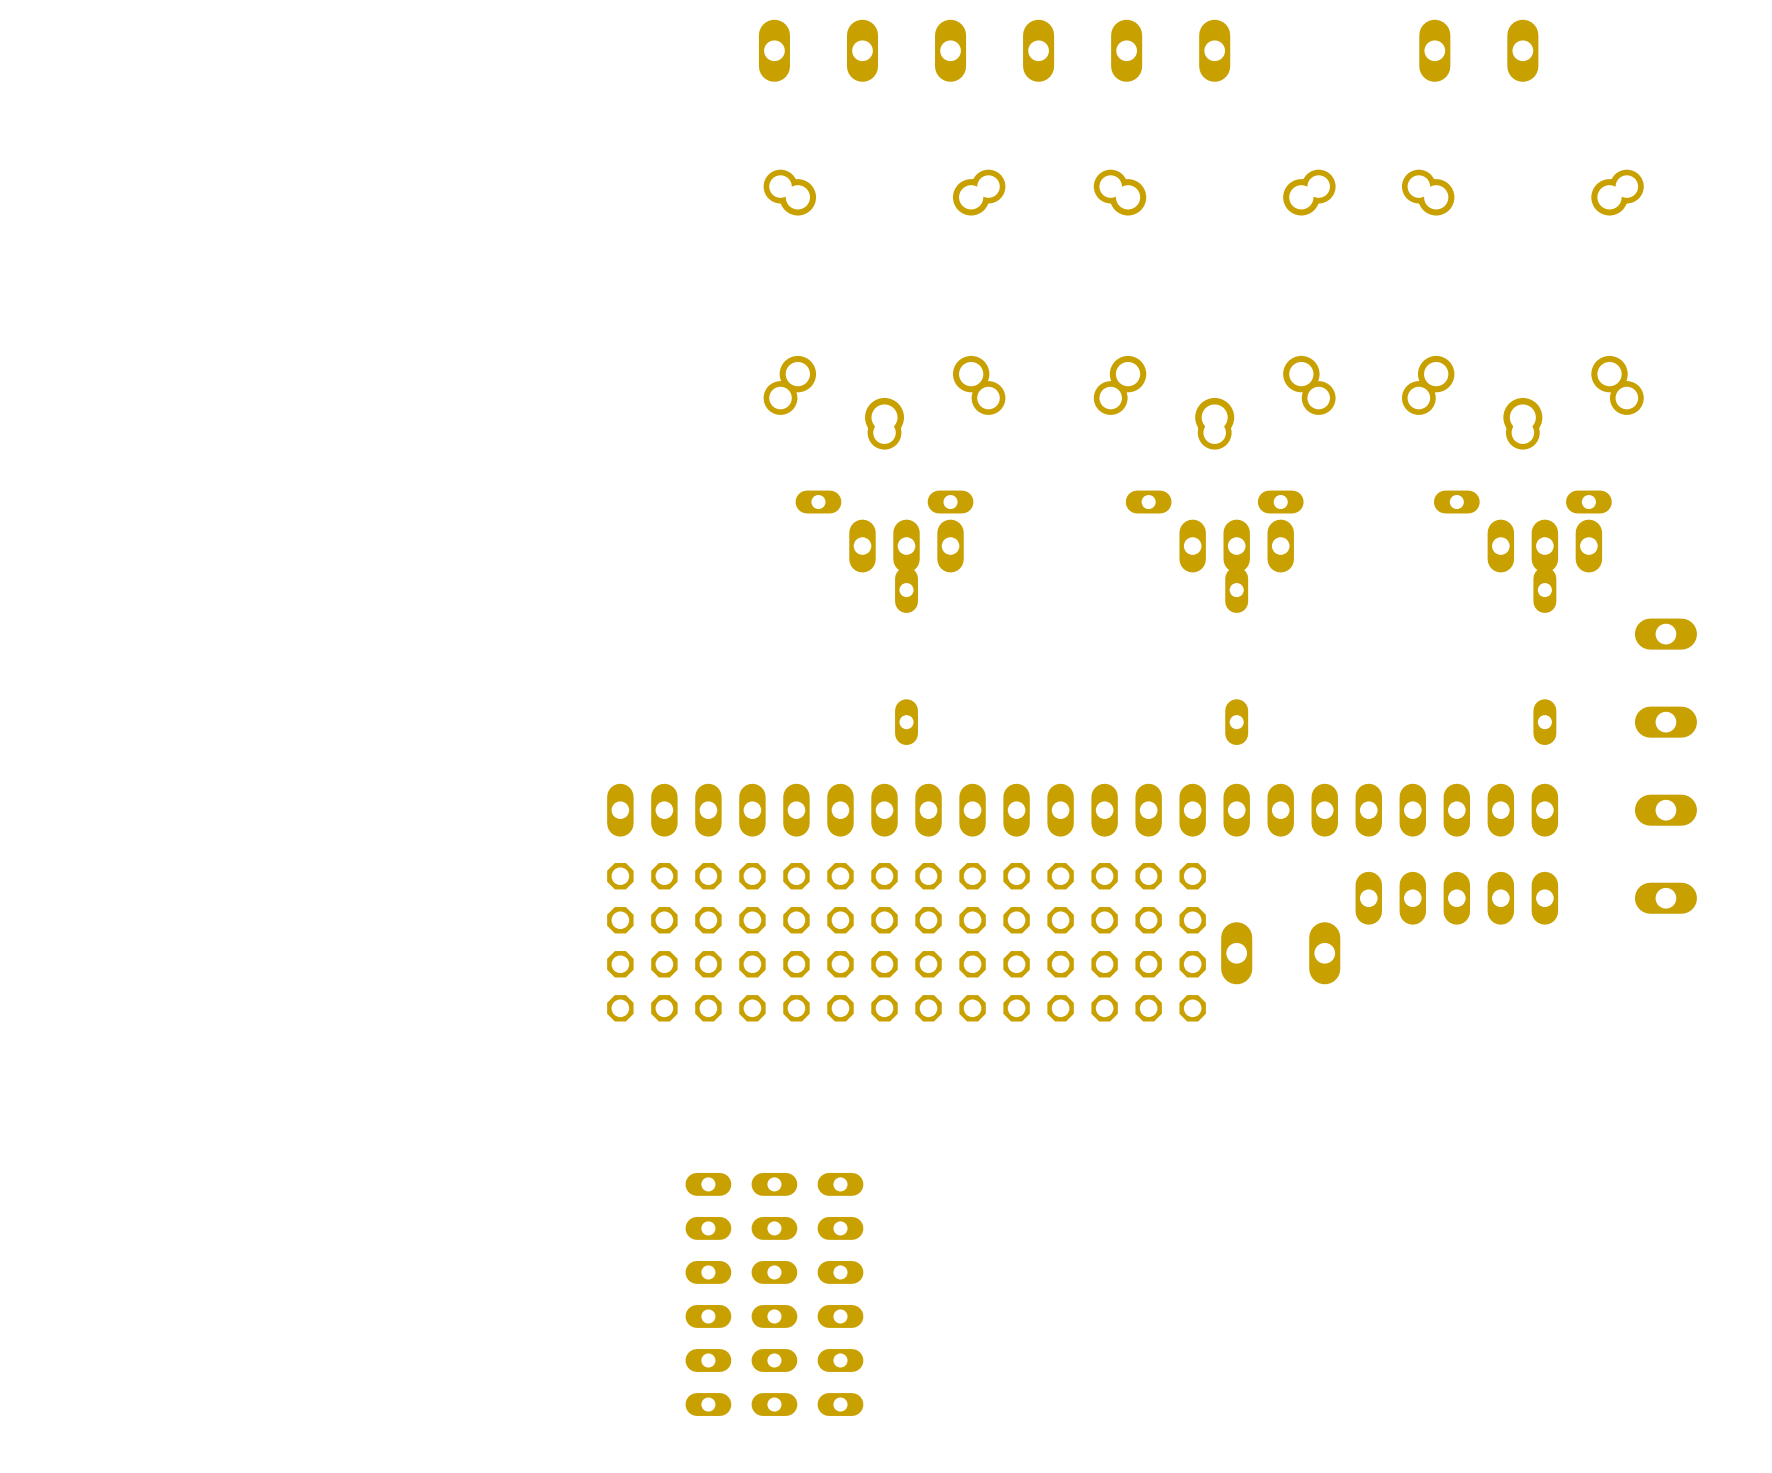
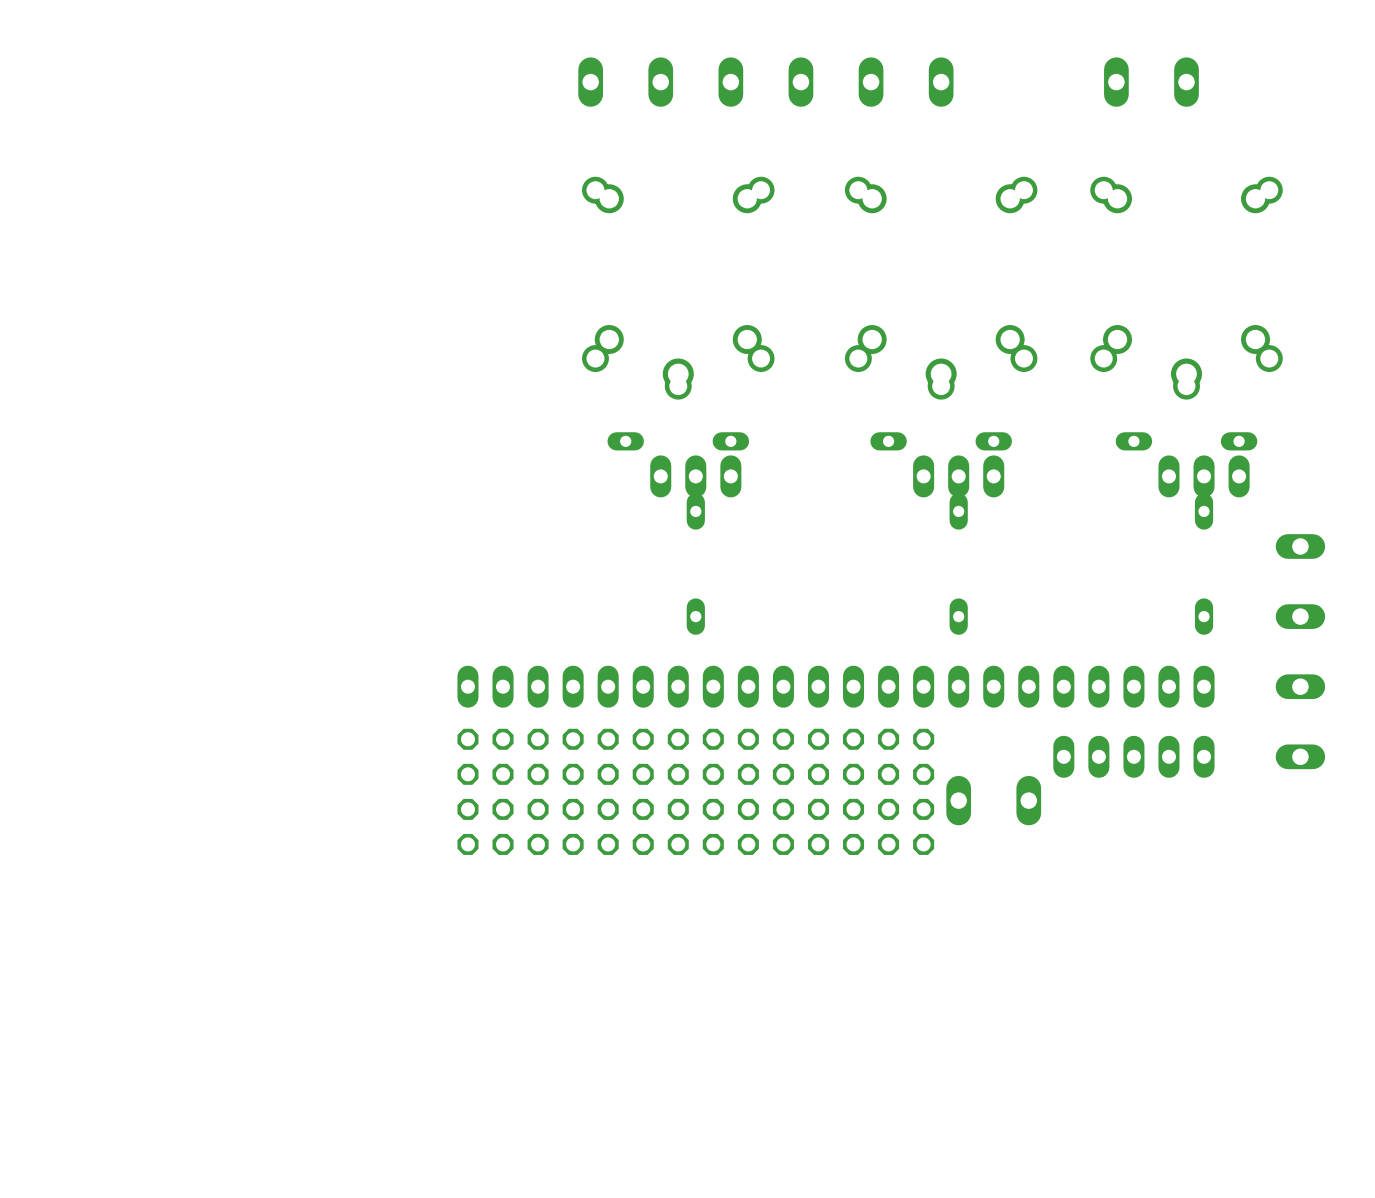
part: (708, 1294) -> none
part: (774, 1294) -> none
part: (840, 1294) -> none

